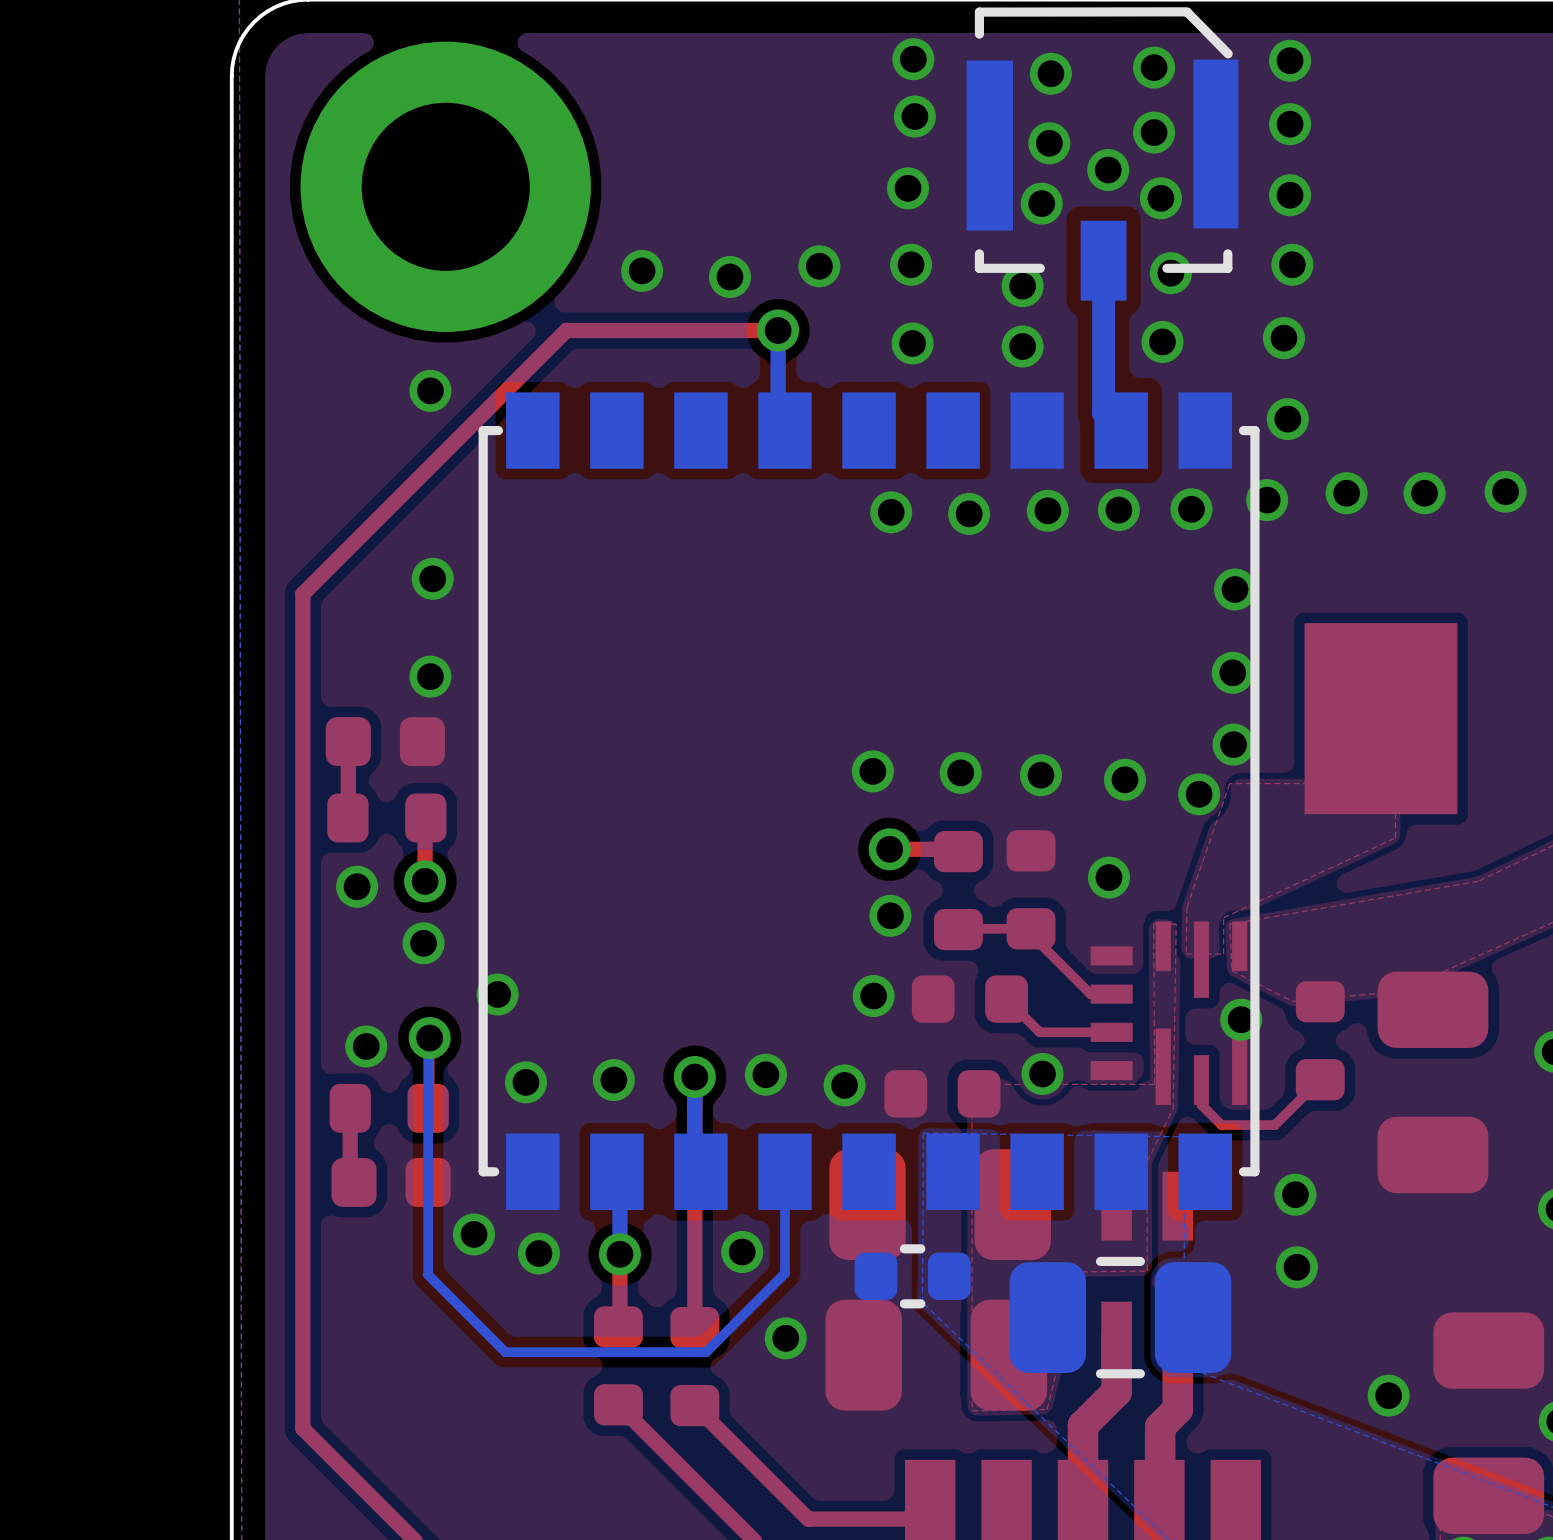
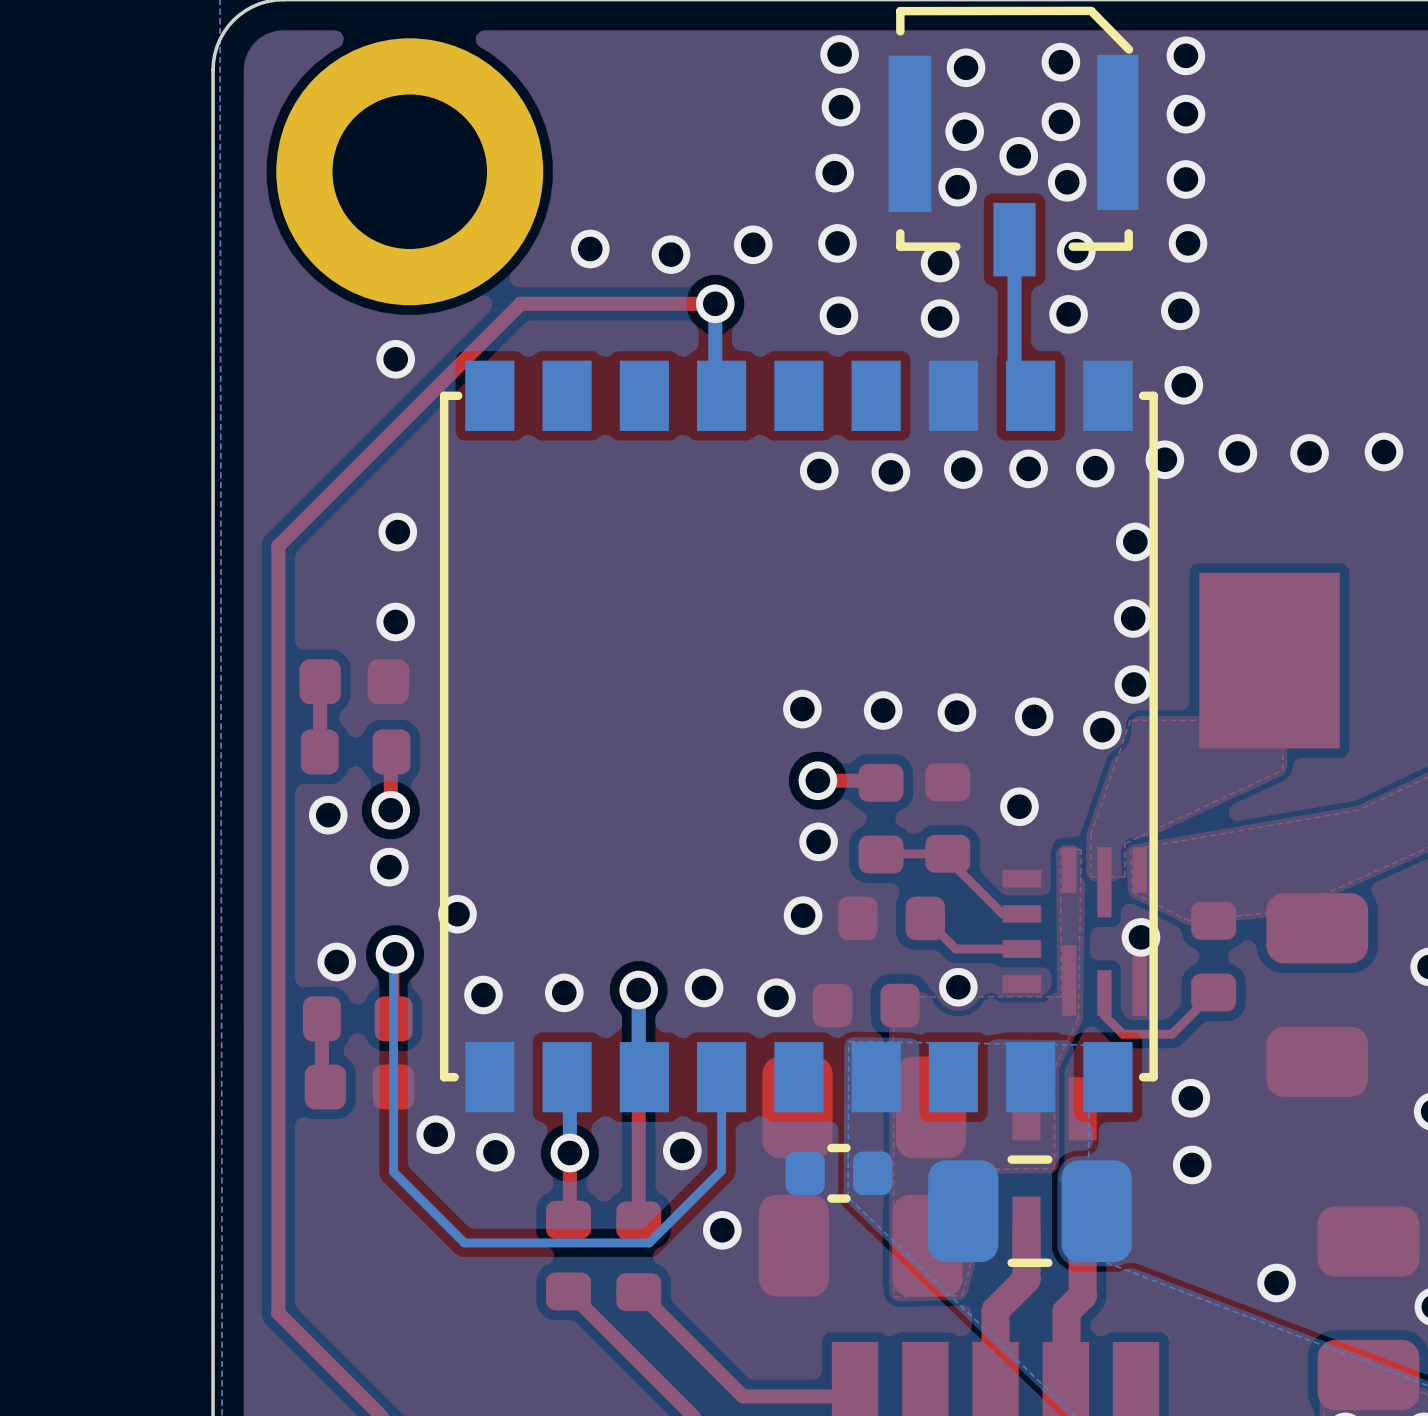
bottom track width: thick (1103, 260) (1103, 413) (1121, 430) -> thin (1014, 239) (1014, 379) (1030, 395)

